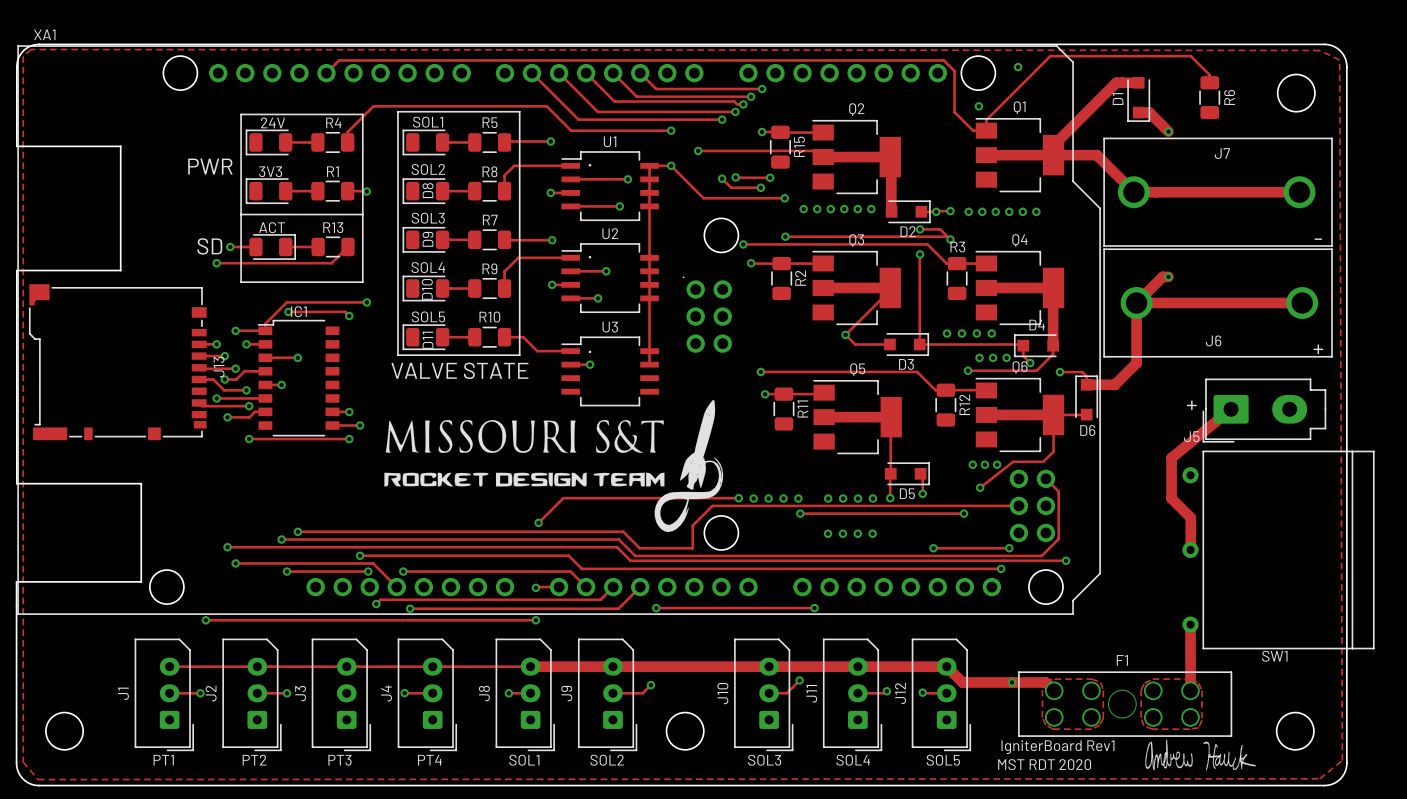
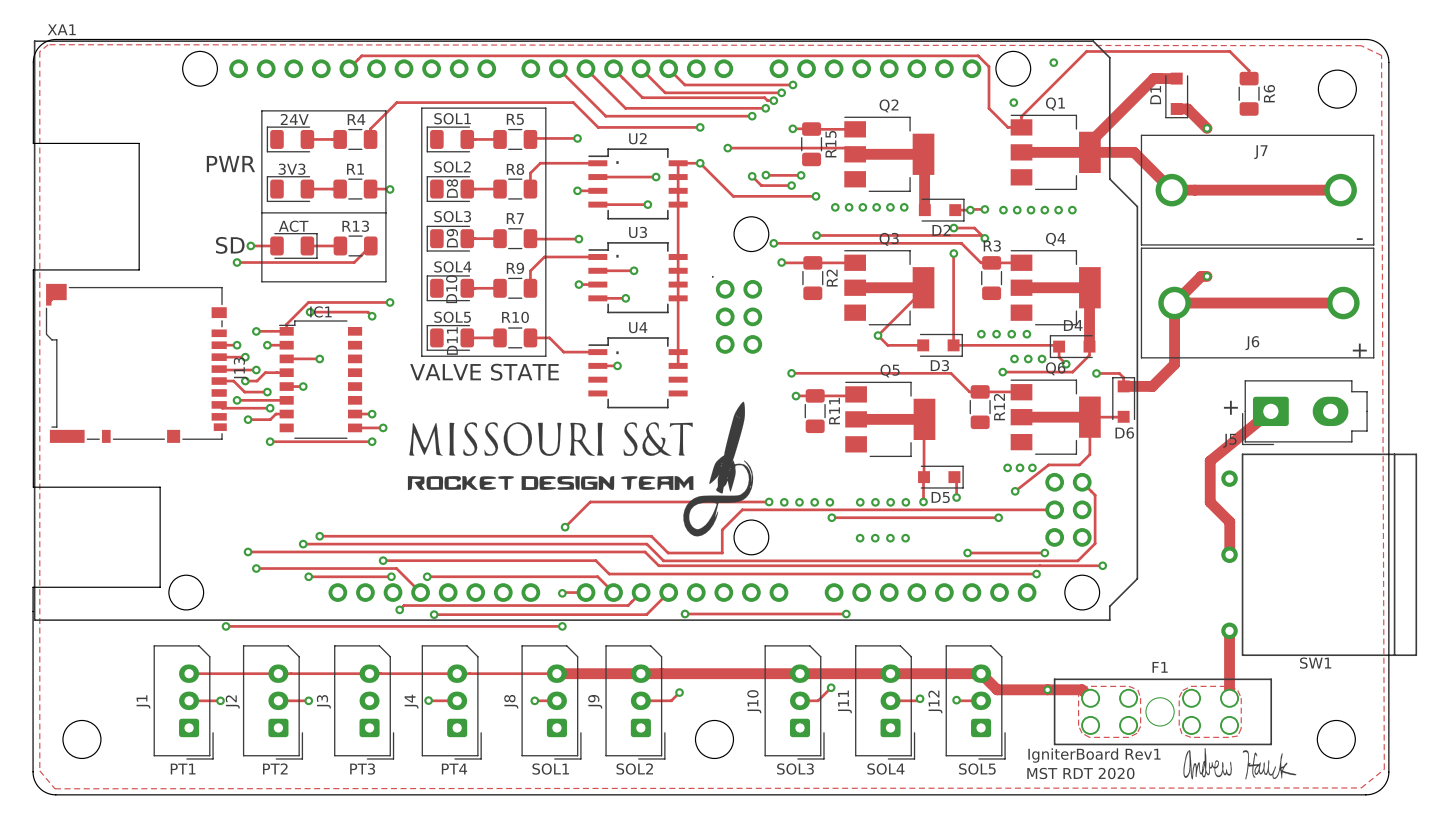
U1 name: U1 (610, 141) -> U2 (637, 138)
U2 name: U2 (610, 233) -> U3 (638, 232)
U3 name: U3 (610, 327) -> U4 (638, 327)

